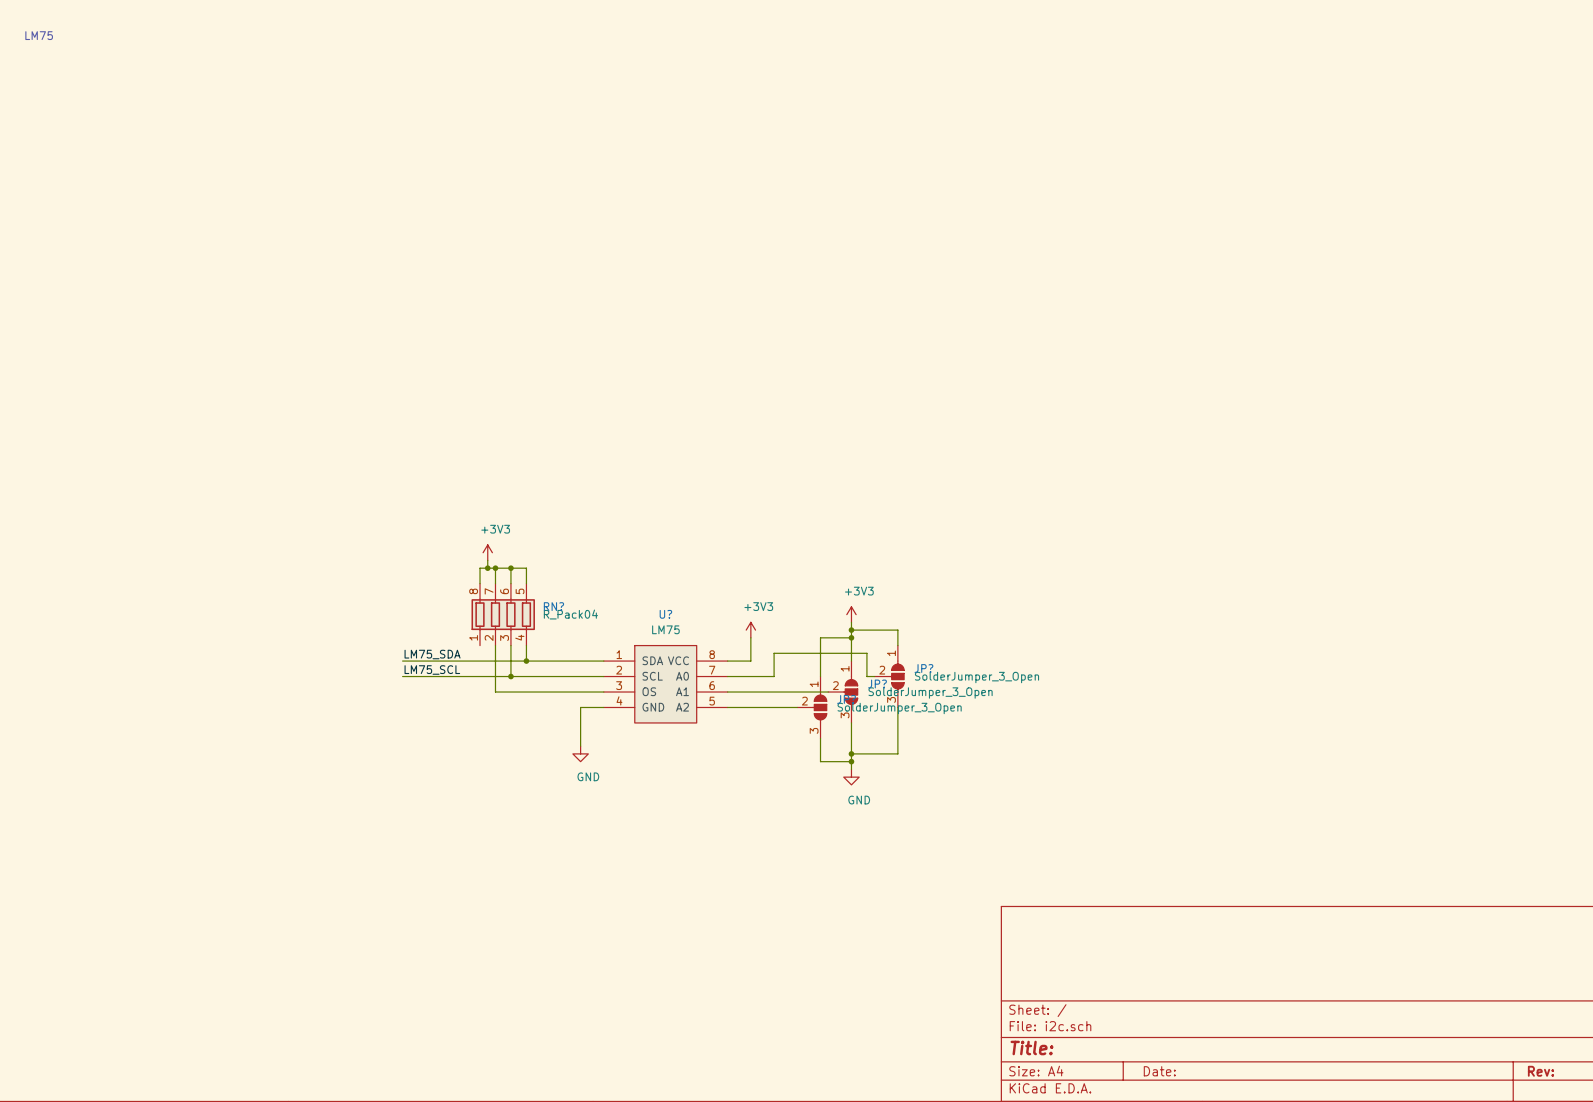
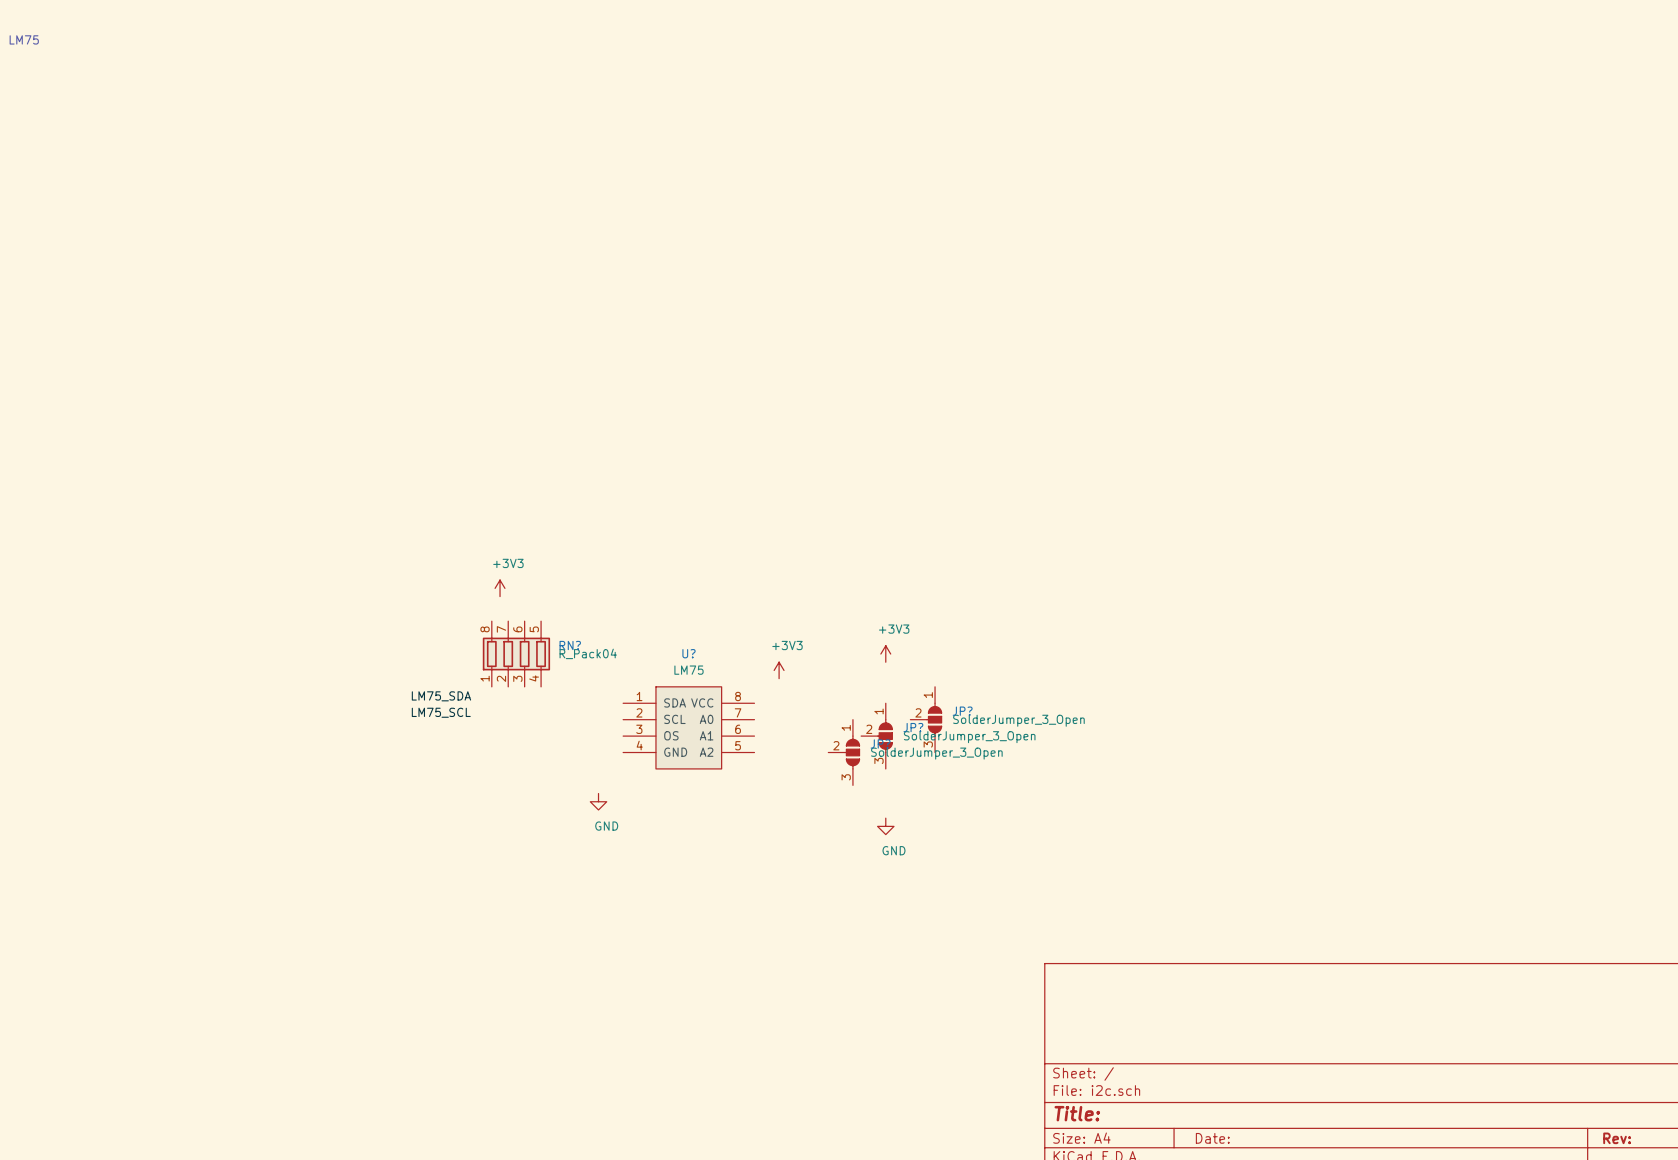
wire: (487, 560) (487, 568) -> none
junction: (487, 568) -> none
wire: (495, 568) (495, 583) -> none
junction: (495, 568) -> none
wire: (510, 568) (510, 583) -> none
junction: (510, 568) -> none
wire: (480, 583) (480, 568) (526, 568) (526, 583) -> none
wire: (851, 622) (851, 661) -> none
wire: (851, 630) (897, 630) (897, 645) -> none
junction: (851, 630) -> none
wire: (750, 637) (750, 661) (727, 661) -> none
wire: (851, 637) (820, 637) (820, 676) -> none
junction: (851, 637) -> none
wire: (495, 645) (495, 692) (603, 692) -> none
wire: (510, 645) (510, 676) -> none
wire: (526, 645) (526, 661) -> none
wire: (402, 661) (603, 661) -> none
junction: (526, 661) -> none
wire: (402, 676) (603, 676) -> none
junction: (510, 676) -> none
wire: (727, 676) (774, 676) (774, 653) (866, 653) (866, 676) (874, 676) -> none
wire: (727, 692) (828, 692) -> none
wire: (603, 707) (580, 707) (580, 746) -> none
wire: (727, 707) (797, 707) -> none
wire: (897, 707) (897, 753) (851, 753) -> none
wire: (851, 722) (851, 769) -> none
wire: (820, 738) (820, 761) (851, 761) -> none
junction: (851, 753) -> none
junction: (851, 761) -> none

